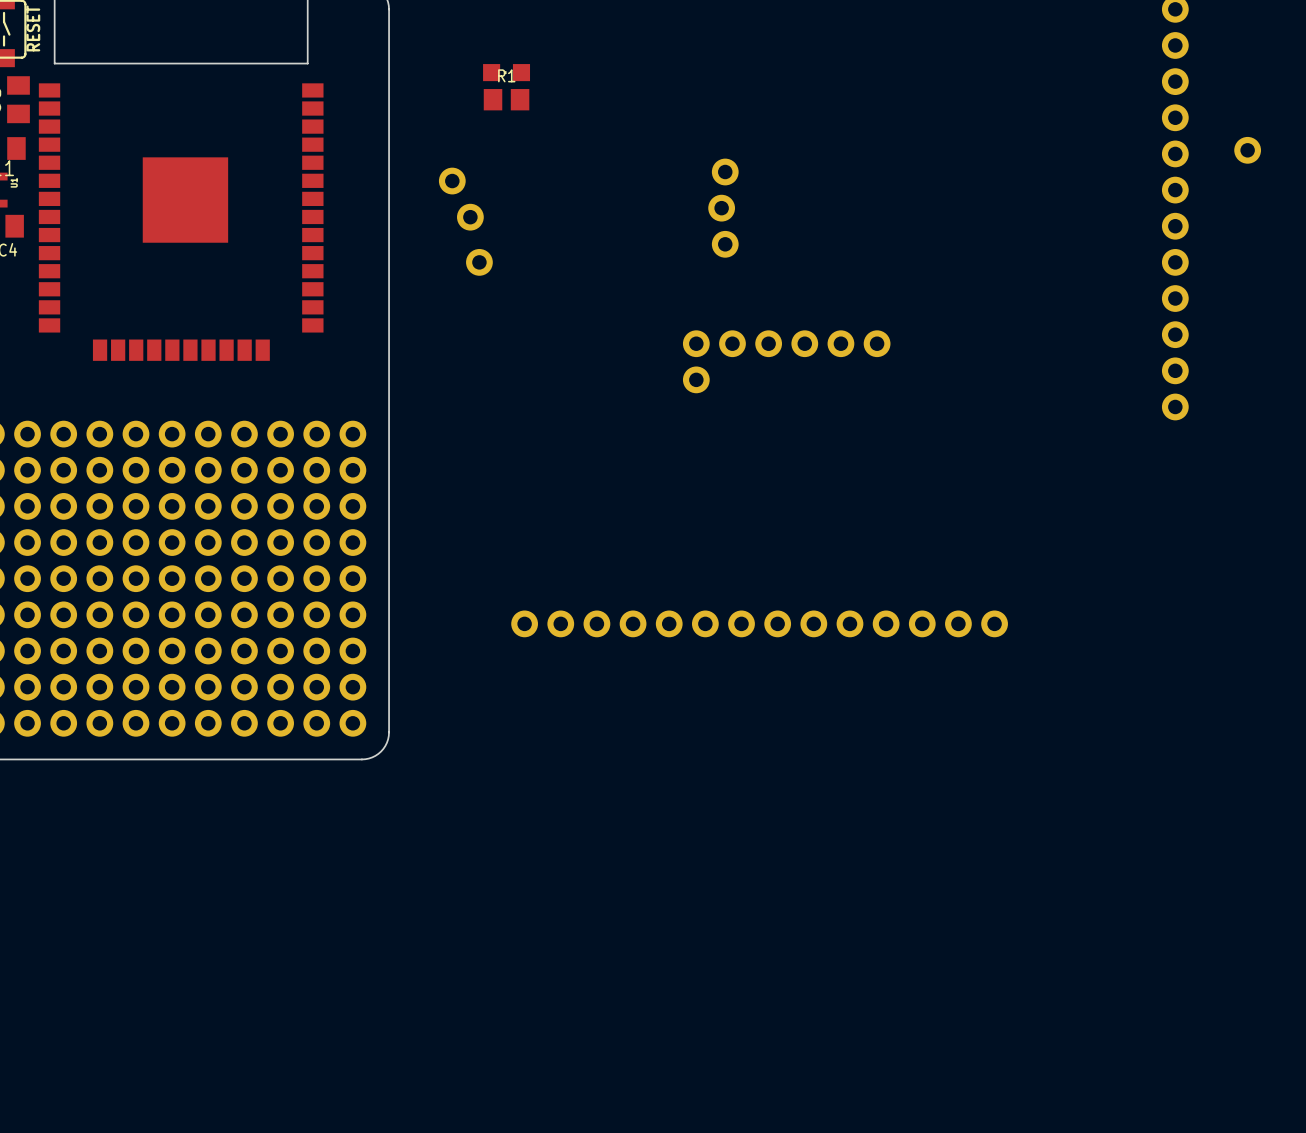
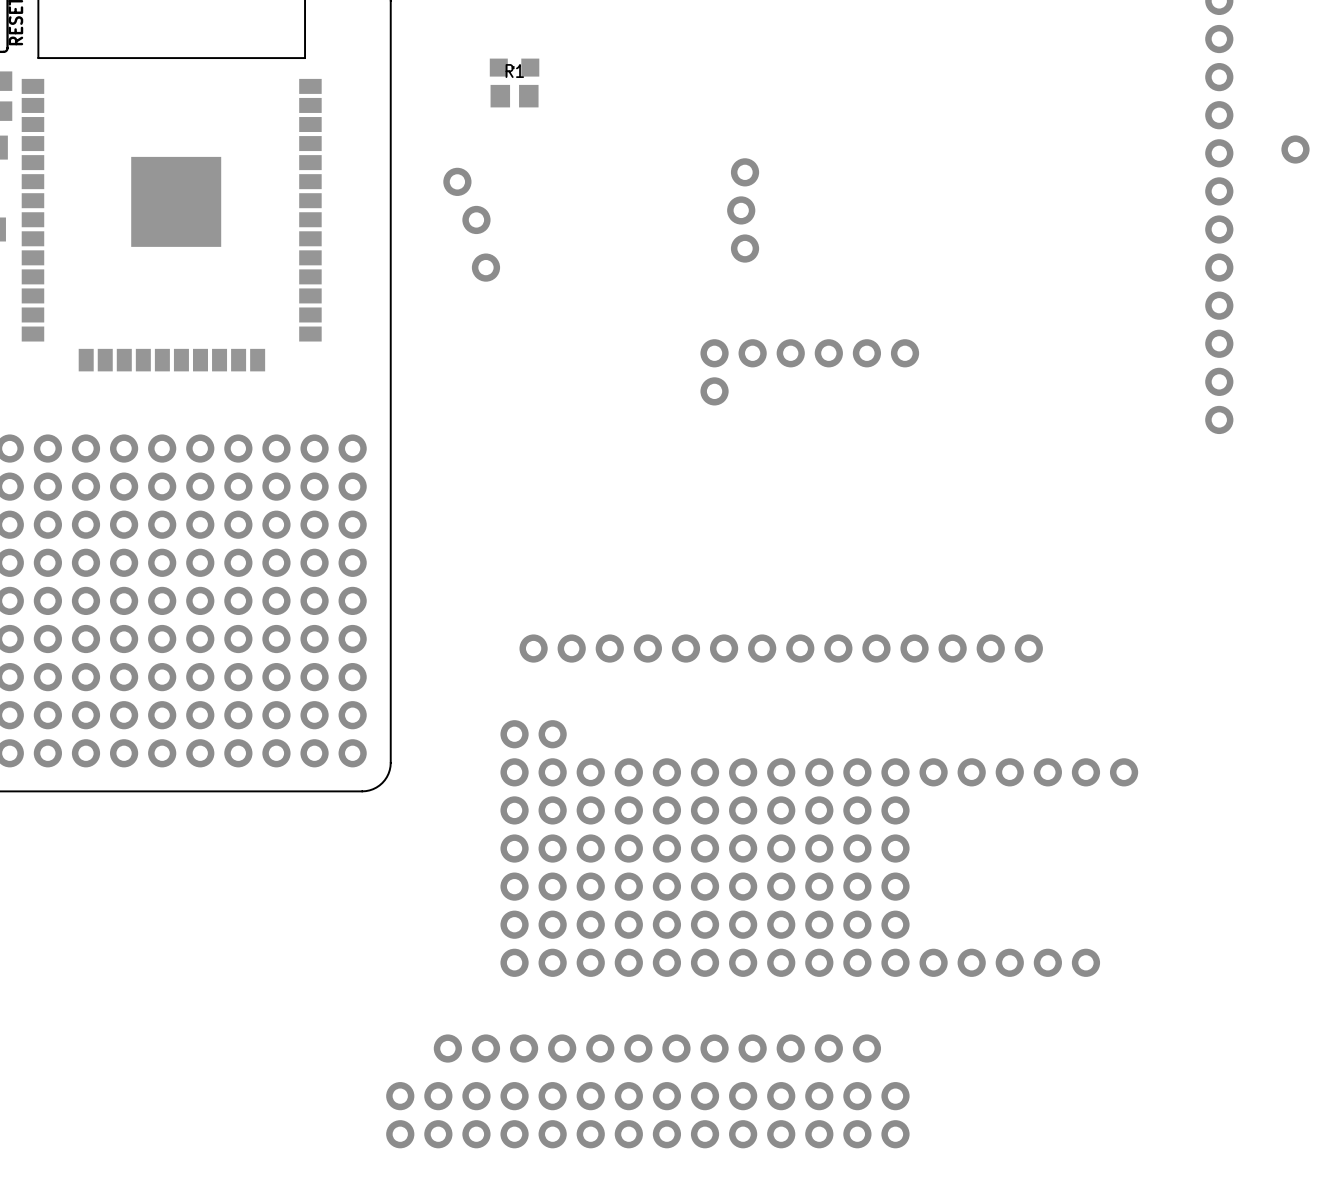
part: none -> (533, 734)
part: none -> (819, 772)
part: none -> (705, 810)
part: none -> (705, 848)
part: none -> (705, 886)
part: none -> (705, 924)
part: none -> (800, 962)
part: none -> (657, 1048)
part: none -> (647, 1096)
part: none -> (647, 1134)

